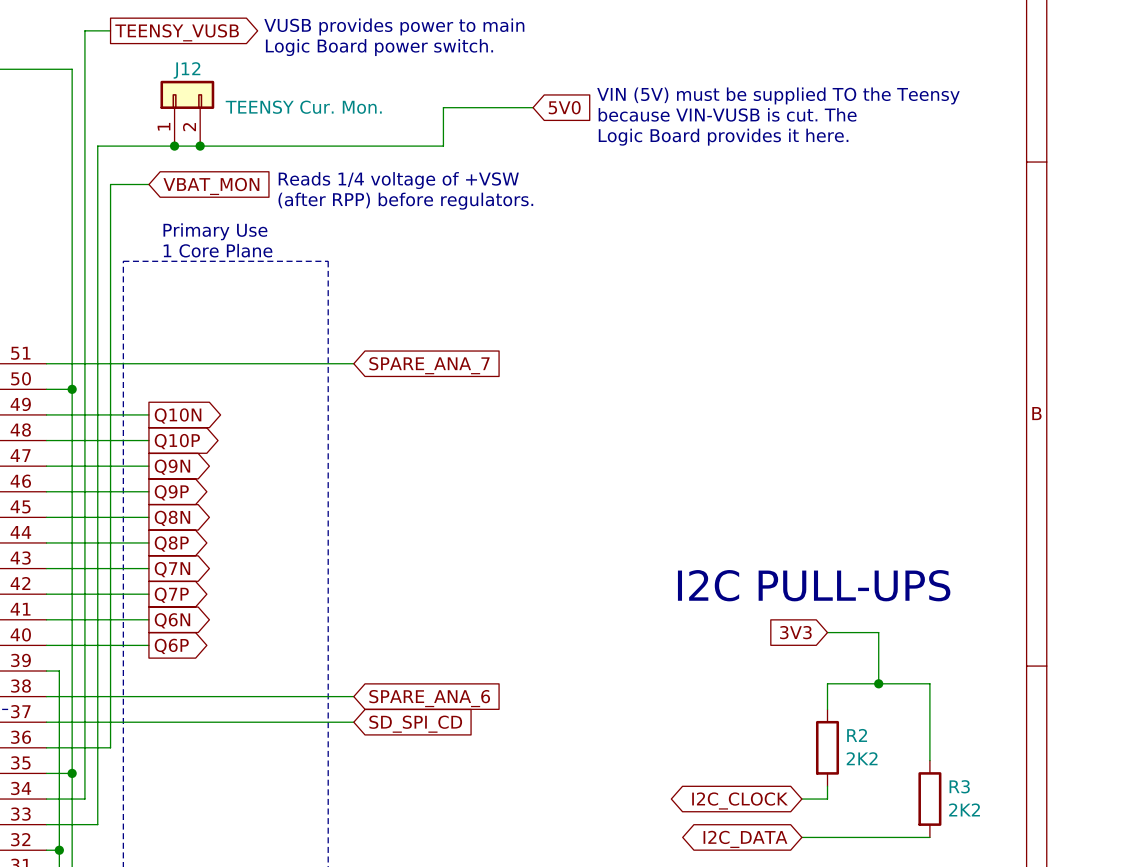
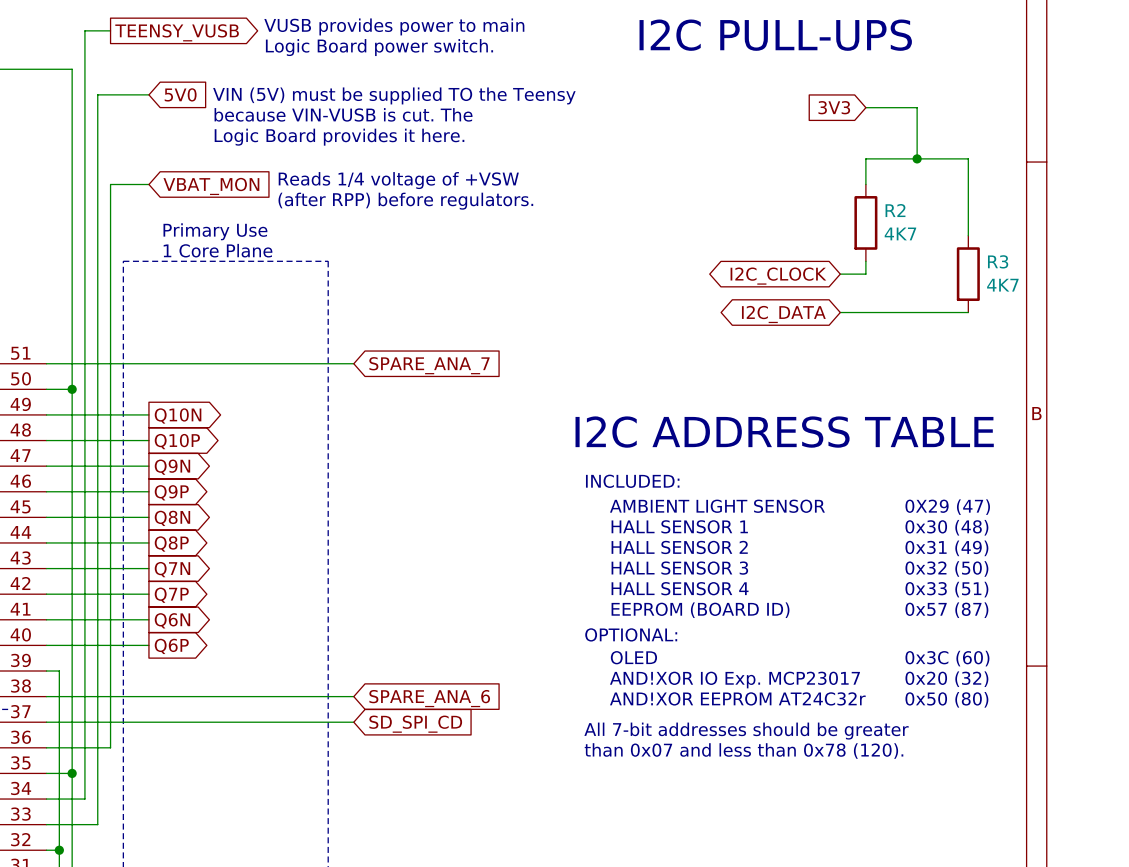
text: none -> I2C PULL-UPS (775, 35)
global label: none -> 5V0 (180, 94)
text: none -> VIN (5V) must be supplied TO the Teensy (394, 95)
text: VIN (5V) must be supplied TO the Teensy (778, 95) -> none
wire: (533, 107) (443, 107) (443, 146) (97, 146) -> (148, 94) (97, 94) (97, 146)
global label: 5V0 (564, 107) -> none
global label: none -> 3V3 (834, 107)
wire: none -> (865, 107) (917, 107) (917, 158)
J12: TEENSY Cur. Mon. (187, 113) -> none
text: none -> because VIN-VUSB is cut. The (343, 114)
text: because VIN-VUSB is cut. The (727, 114) -> none
text: none -> Logic Board provides it here. (339, 137)
text: Logic Board provides it here. (723, 137) -> none
junction: (174, 146) -> none
junction: (200, 146) -> none
junction: none -> (917, 158)
wire: none -> (865, 184) (865, 158) (968, 158) (968, 235)
wire: none -> (865, 261) (865, 274) (840, 274)
global label: none -> I2C_CLOCK (778, 276)
wire: none -> (840, 312) (968, 312)
global label: none -> I2C_DATA (783, 314)
text: none -> I2C ADDRESS TABLE (784, 432)
text: none -> INCLUDED: (632, 481)
text: none -> AMBIENT LIGHT SENSOR (717, 506)
text: none -> 0X29 (47) (947, 507)
text: none -> HALL SENSOR 1 (679, 526)
text: none -> 0x30 (48) (946, 527)
text: none -> HALL SENSOR 2 (679, 547)
text: none -> 0x31 (49) (946, 548)
text: none -> HALL SENSOR 3 (679, 568)
text: none -> 0x32 (50) (946, 568)
text: I2C PULL-UPS (814, 585) -> none
text: none -> HALL SENSOR 4 (680, 588)
text: none -> 0x33 (51) (946, 589)
text: none -> EEPROM (BOARD ID) (700, 610)
text: none -> 0x57 (87) (946, 610)
global label: 3V3 (795, 632) -> none
wire: (827, 632) (878, 632) (878, 683) -> none
text: none -> OPTIONAL: (631, 634)
text: none -> OLED (633, 657)
text: none -> 0x3C (60) (947, 658)
text: none -> 0x20 (32) (946, 679)
text: none -> AND!XOR IO Exp. MCP23017 (734, 680)
junction: (878, 683) -> none
text: none -> AND!XOR EEPROM AT24C32r (737, 698)
text: none -> 0x50 (80) (946, 699)
wire: (827, 709) (827, 683) (929, 683) (929, 760) -> none
text: none -> All 7-bit addresses should be greater (746, 731)
R2 position: (827, 747) -> (865, 222)
text: none -> than 0x07 and less than 0x78 (120). (744, 751)
R2 value: 2K2 (862, 758) -> 4K7 (900, 233)
wire: (827, 786) (827, 799) (801, 799) -> none
R3 position: (929, 799) -> (968, 274)
global label: I2C_CLOCK (740, 800) -> none
R3 value: 2K2 (964, 809) -> 4K7 (1002, 285)
wire: (801, 837) (929, 837) -> none
global label: I2C_DATA (745, 839) -> none

